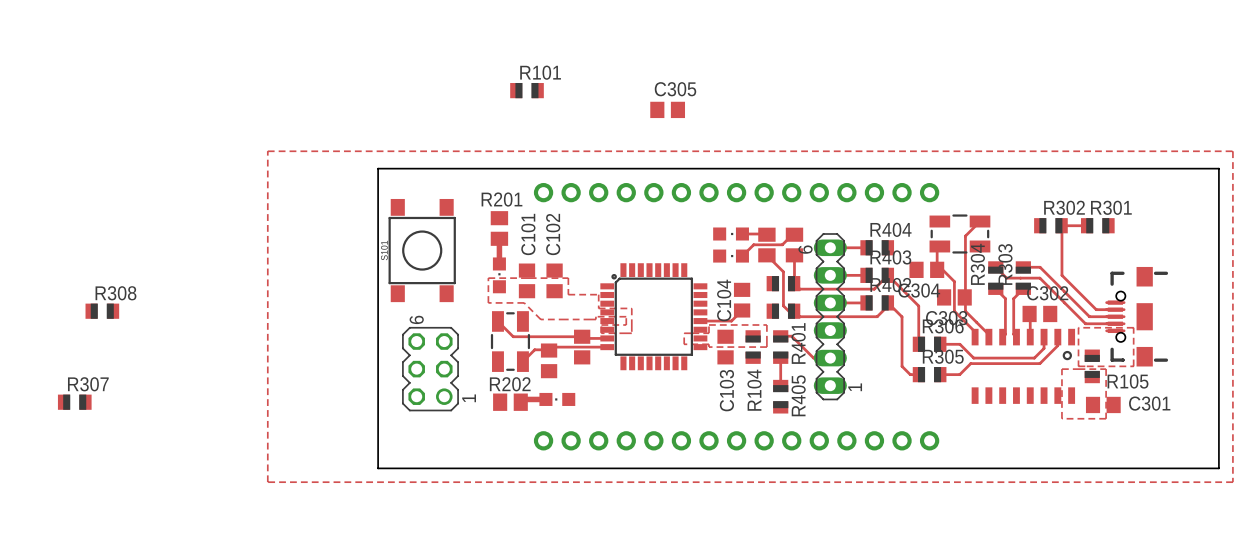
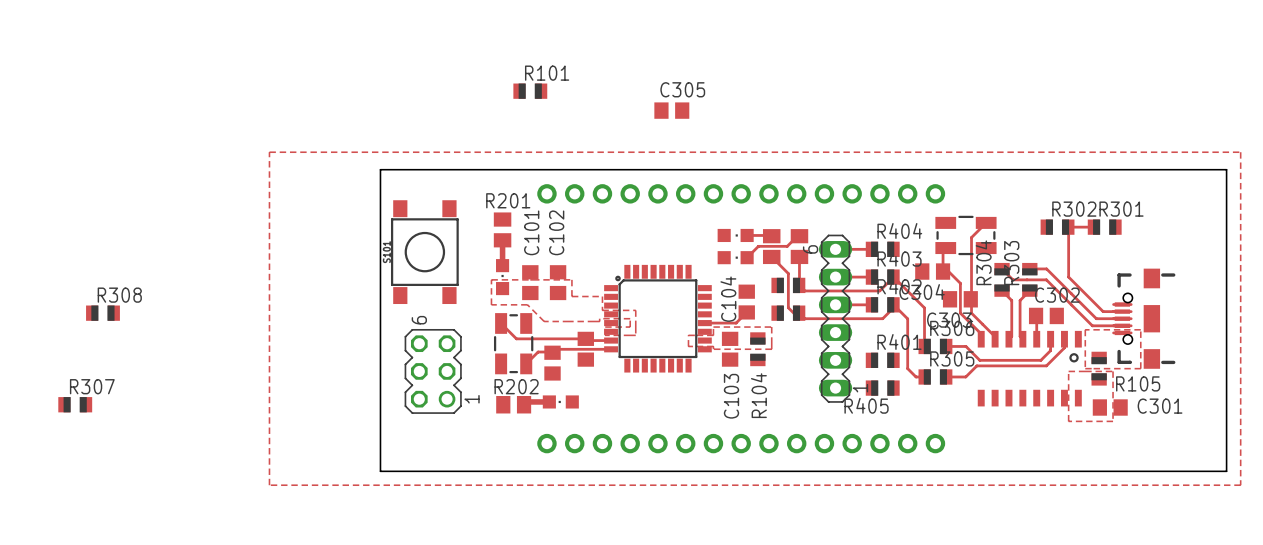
top track: (780, 336) (791, 336) (813, 358) (830, 358) -> none
R401 rotation: 0° (780, 347) -> 90° clockwise (882, 360)
R401 position: (780, 347) -> (882, 360)
top track: (780, 357) (780, 385) -> none
R405 rotation: 0° (780, 396) -> 90° clockwise (882, 388)
R405 position: (780, 396) -> (882, 388)

